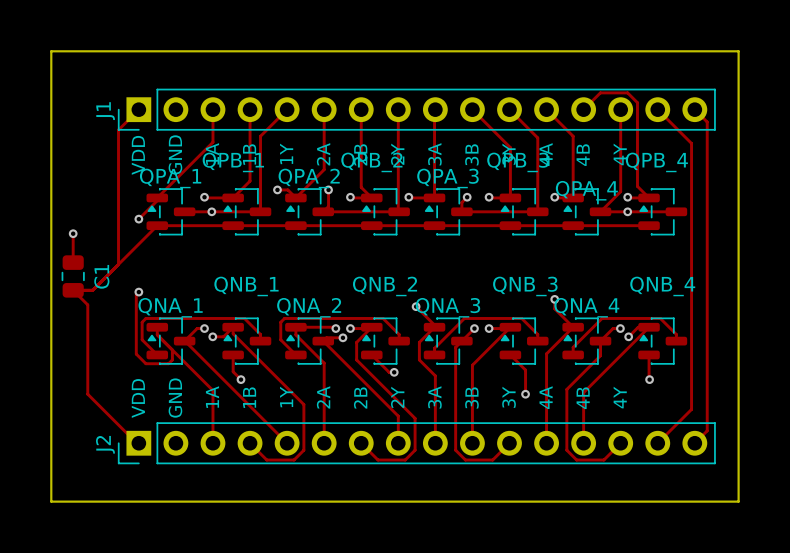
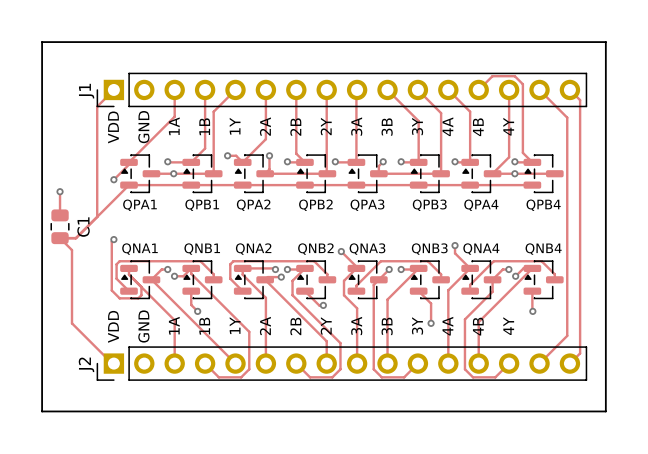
QPB_1 name: QPB_1 (233, 162) -> QPB1 (202, 205)
QPB_2 name: QPB_2 (371, 162) -> QPB2 (315, 205)
QPB_3 name: QPB_3 (518, 162) -> QPB3 (429, 205)
QPB_4 name: QPB_4 (656, 162) -> QPB4 (543, 205)
QPA_1 name: QPA_1 (170, 178) -> QPA1 (139, 205)
QPA_2 name: QPA_2 (309, 178) -> QPA2 (253, 205)
QPA_3 name: QPA_3 (447, 178) -> QPA3 (367, 205)
QPA_4 name: QPA_4 (586, 190) -> QPA4 (481, 205)
QNB_1 name: QNB_1 (246, 286) -> QNB1 (202, 249)
QNB_2 name: QNB_2 (385, 286) -> QNB2 (315, 249)
QNB_3 name: QNB_3 (525, 286) -> QNB3 (429, 249)
QNB_4 name: QNB_4 (662, 286) -> QNB4 (543, 249)
QNA_1 name: QNA_1 (170, 307) -> QNA1 (139, 249)
QNA_2 name: QNA_2 (309, 307) -> QNA2 (253, 249)
QNA_3 name: QNA_3 (447, 307) -> QNA3 (367, 249)
QNA_4 name: QNA_4 (586, 307) -> QNA4 (481, 249)

